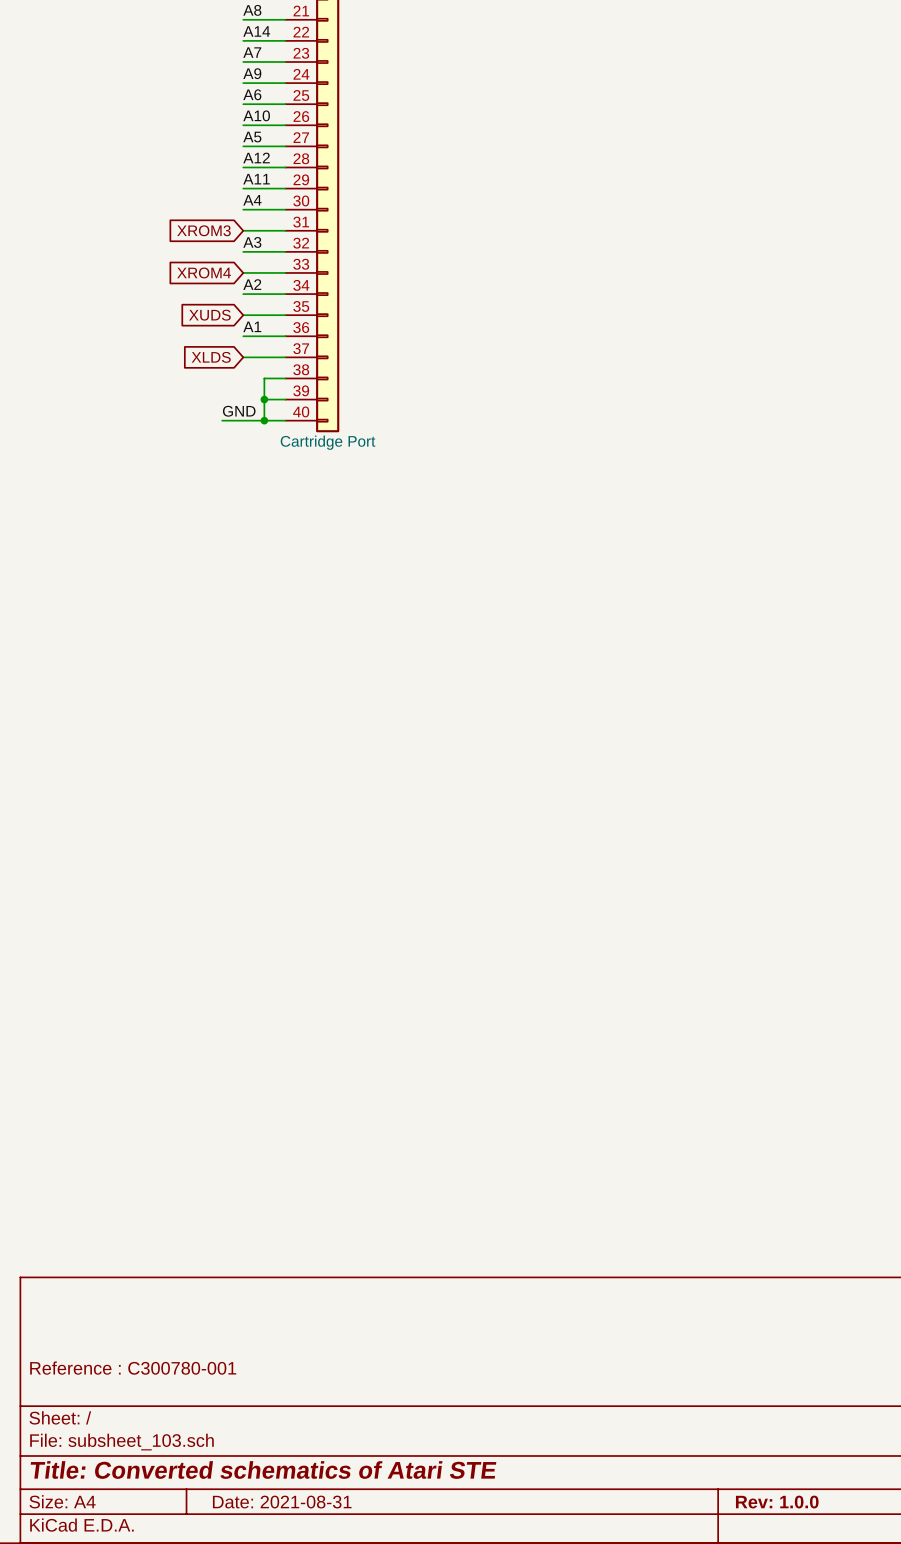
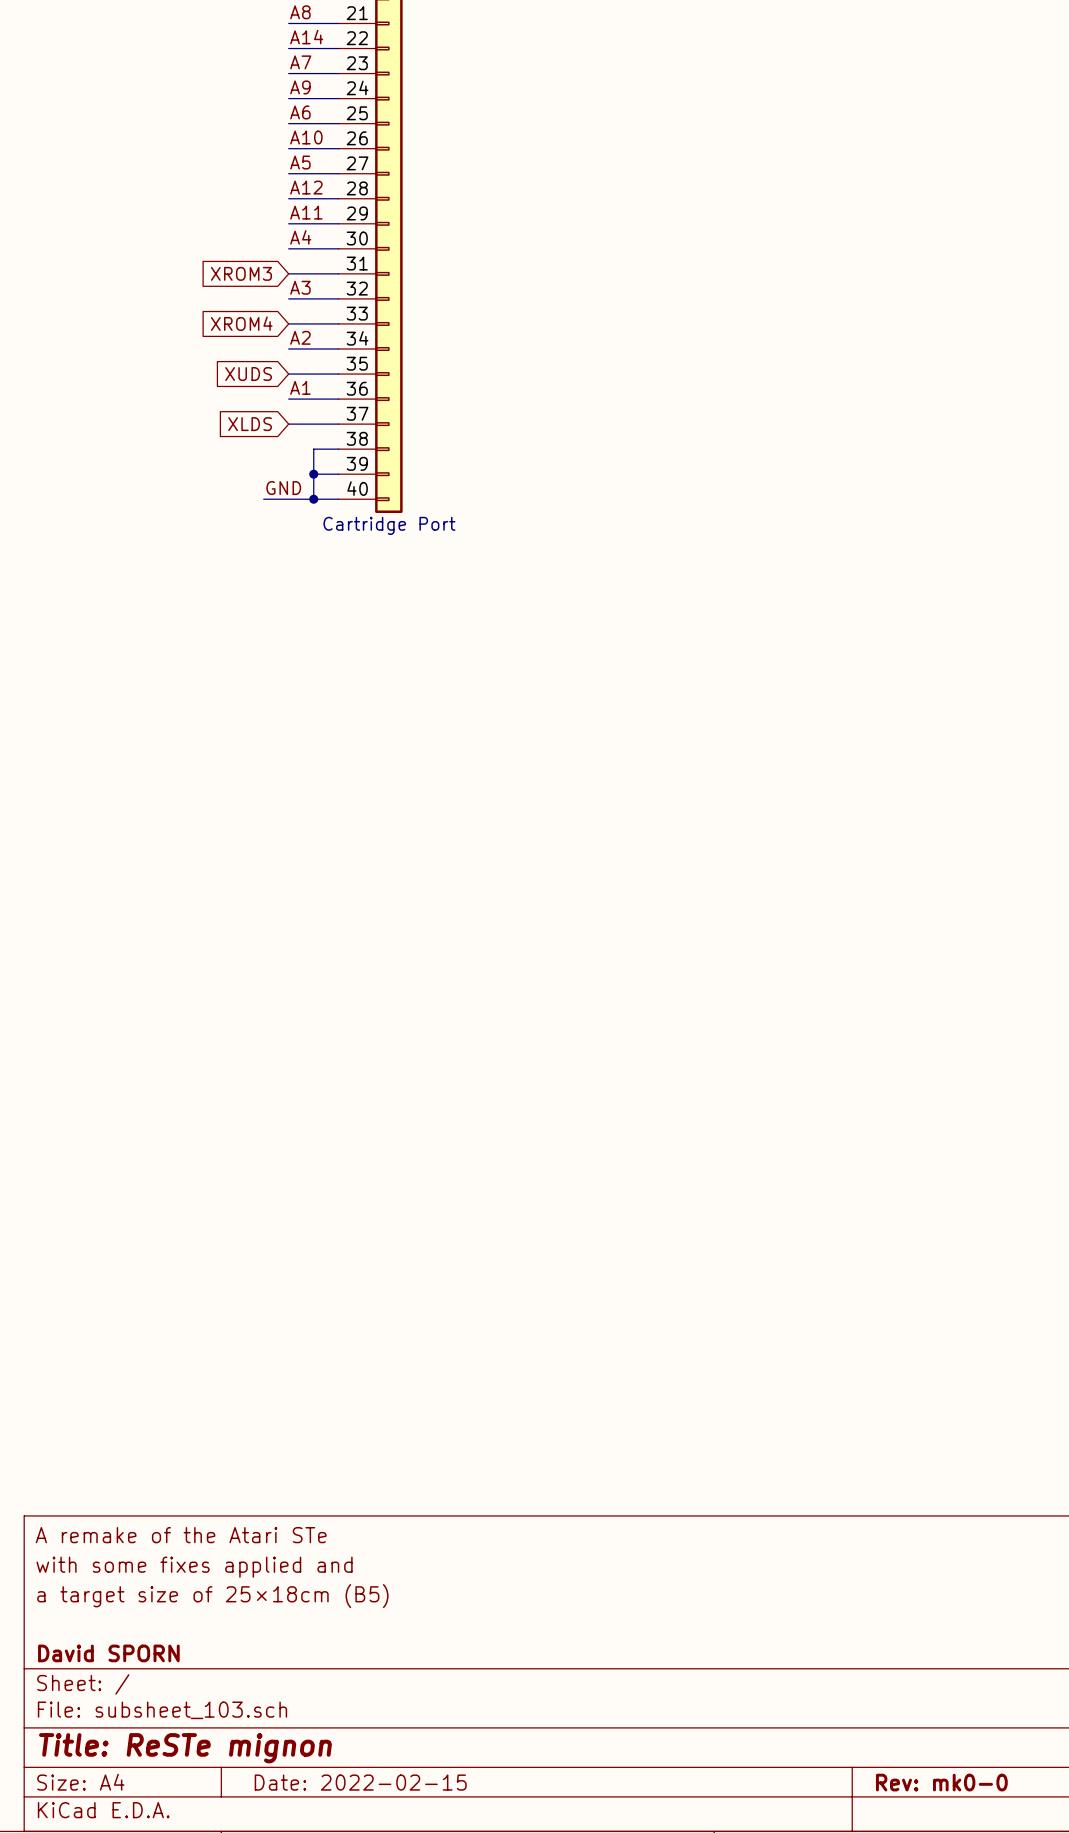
title block: none -> A remake of the Atari STe (181, 1535)
title block: none -> with some fixes applied and (194, 1567)
title block: none -> a target size of 25×18cm (B5) (212, 1596)
title block: Reference : C300780-001 (133, 1368) -> none
title block: none -> David SPORN (108, 1653)
title block: Title: Converted schematics of Atari STE (263, 1470) -> Title: ReSTe mignon (185, 1748)
title block: Date: 2021-08-31 (282, 1502) -> Date: 2022-02-15 (360, 1782)
title block: Rev: 1.0.0 (777, 1502) -> Rev: mk0-0 (941, 1782)

